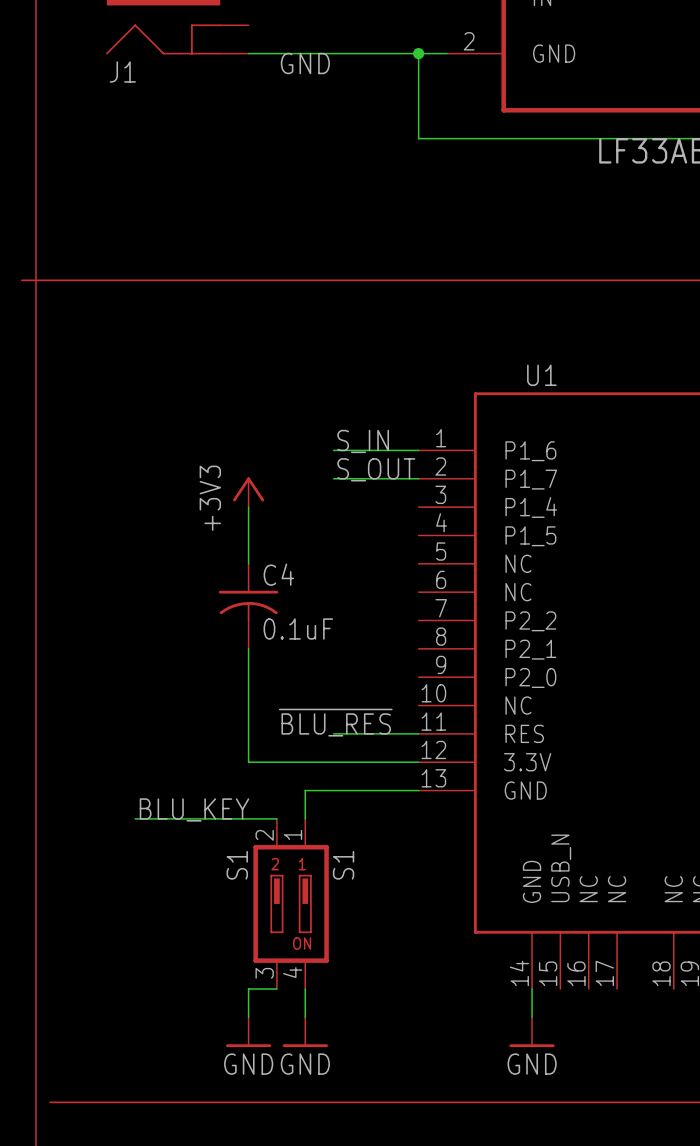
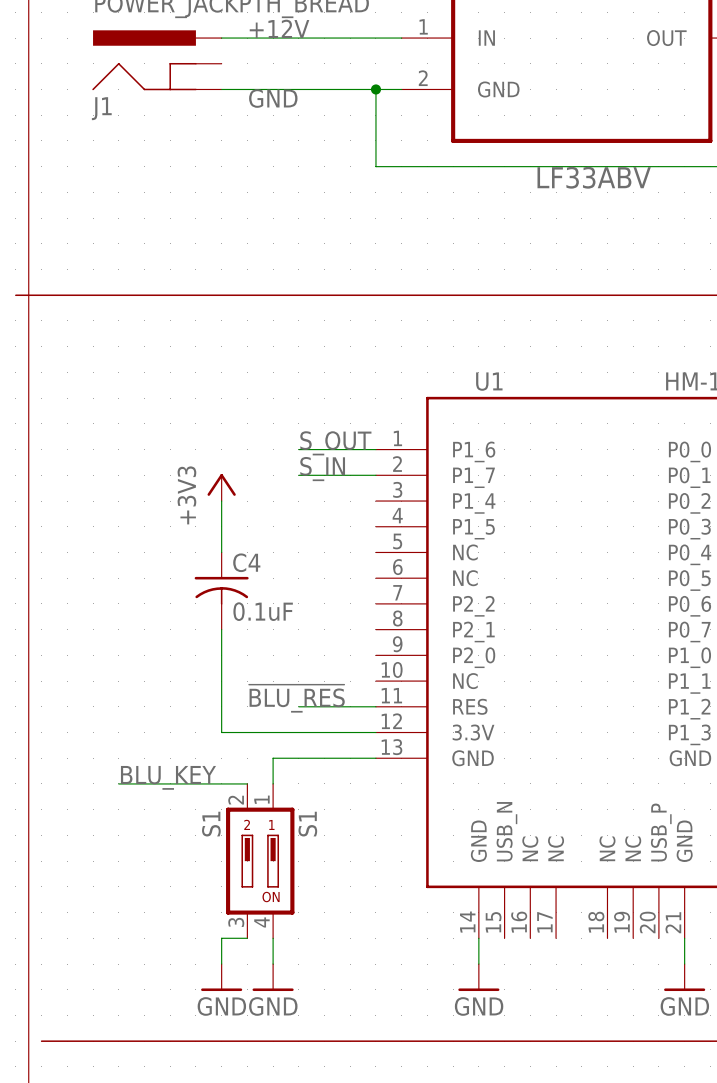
label: S_IN (363, 441) -> S_OUT (335, 443)
label: S_OUT (376, 469) -> S_IN (322, 469)

